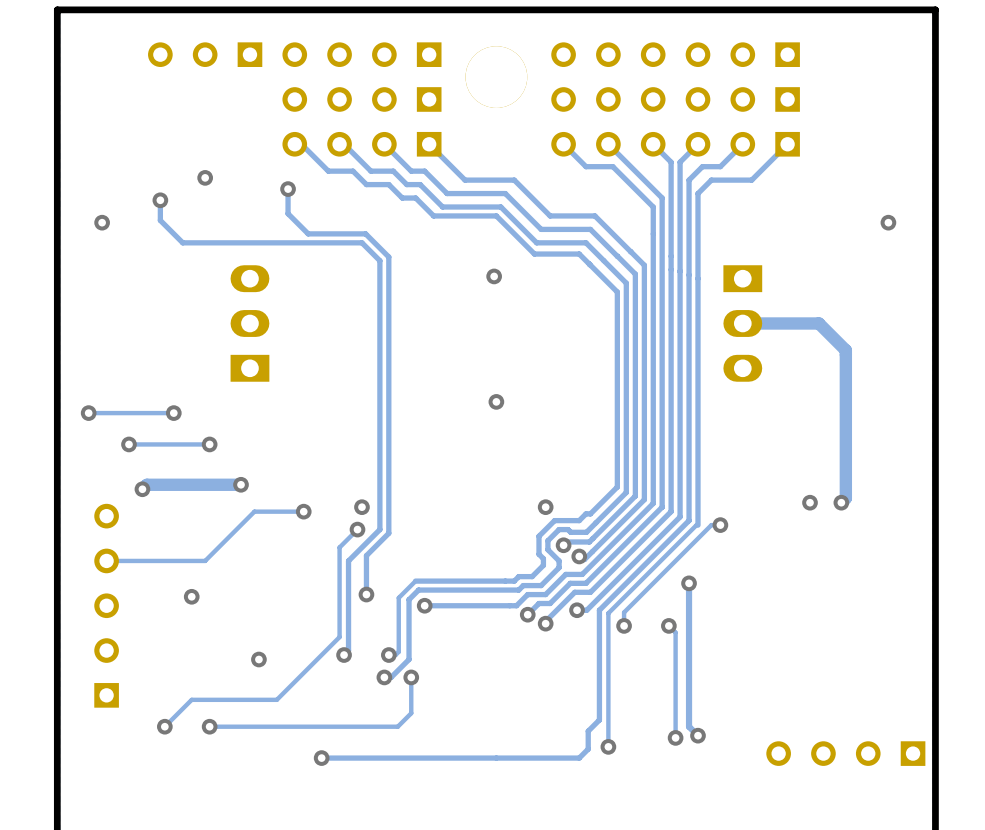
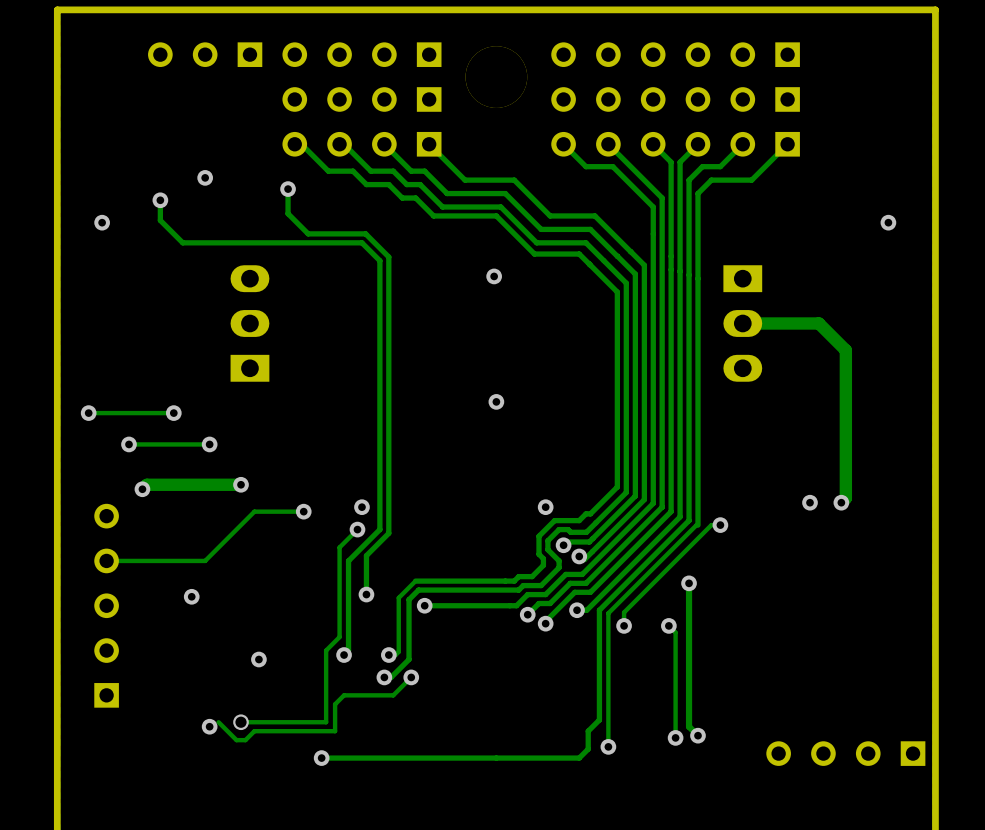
track: (326, 650) (276, 699) (191, 699) (164, 726) -> (326, 650) (326, 722) (241, 722)
track: (411, 677) (411, 713) (397, 726) (209, 726) -> (411, 677) (393, 695) (344, 695) (335, 704) (335, 731) (254, 731) (245, 740) (236, 740) (218, 722)
via: none -> (241, 722)
via: (164, 726) -> none

